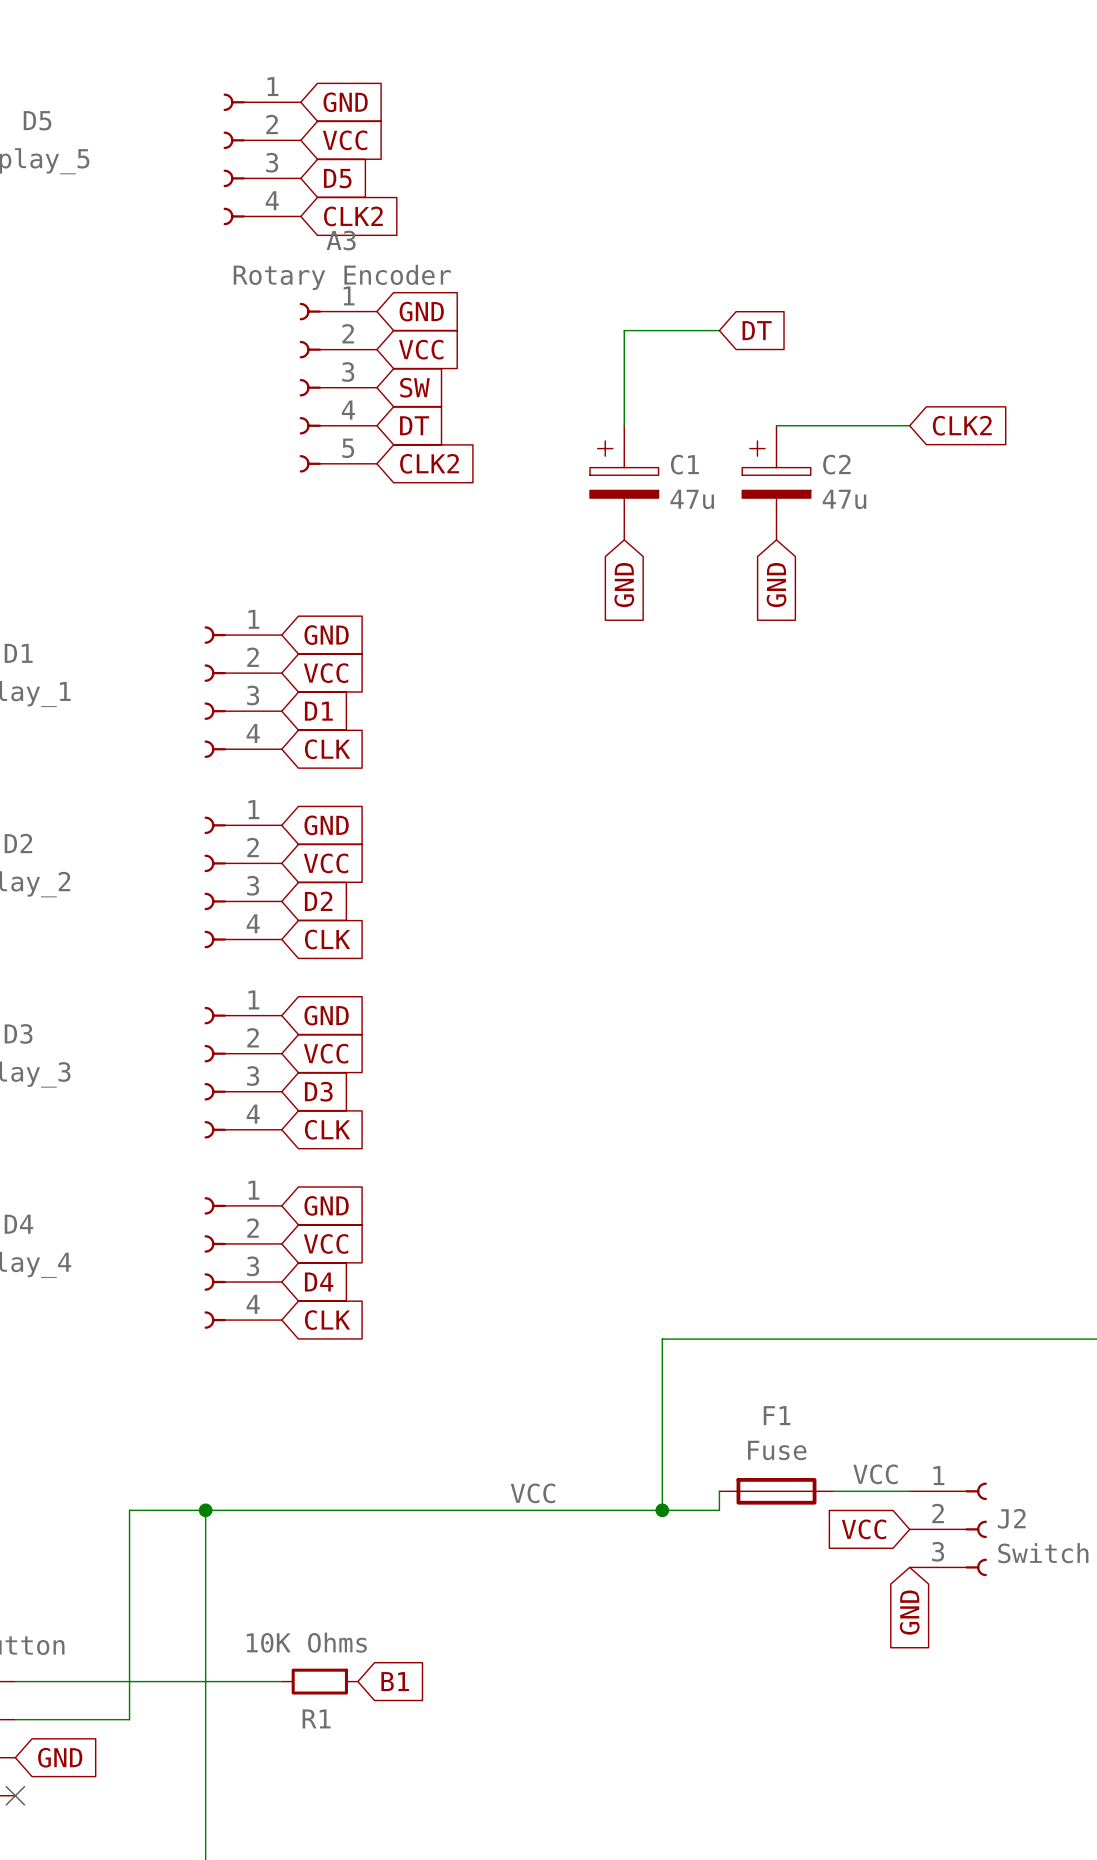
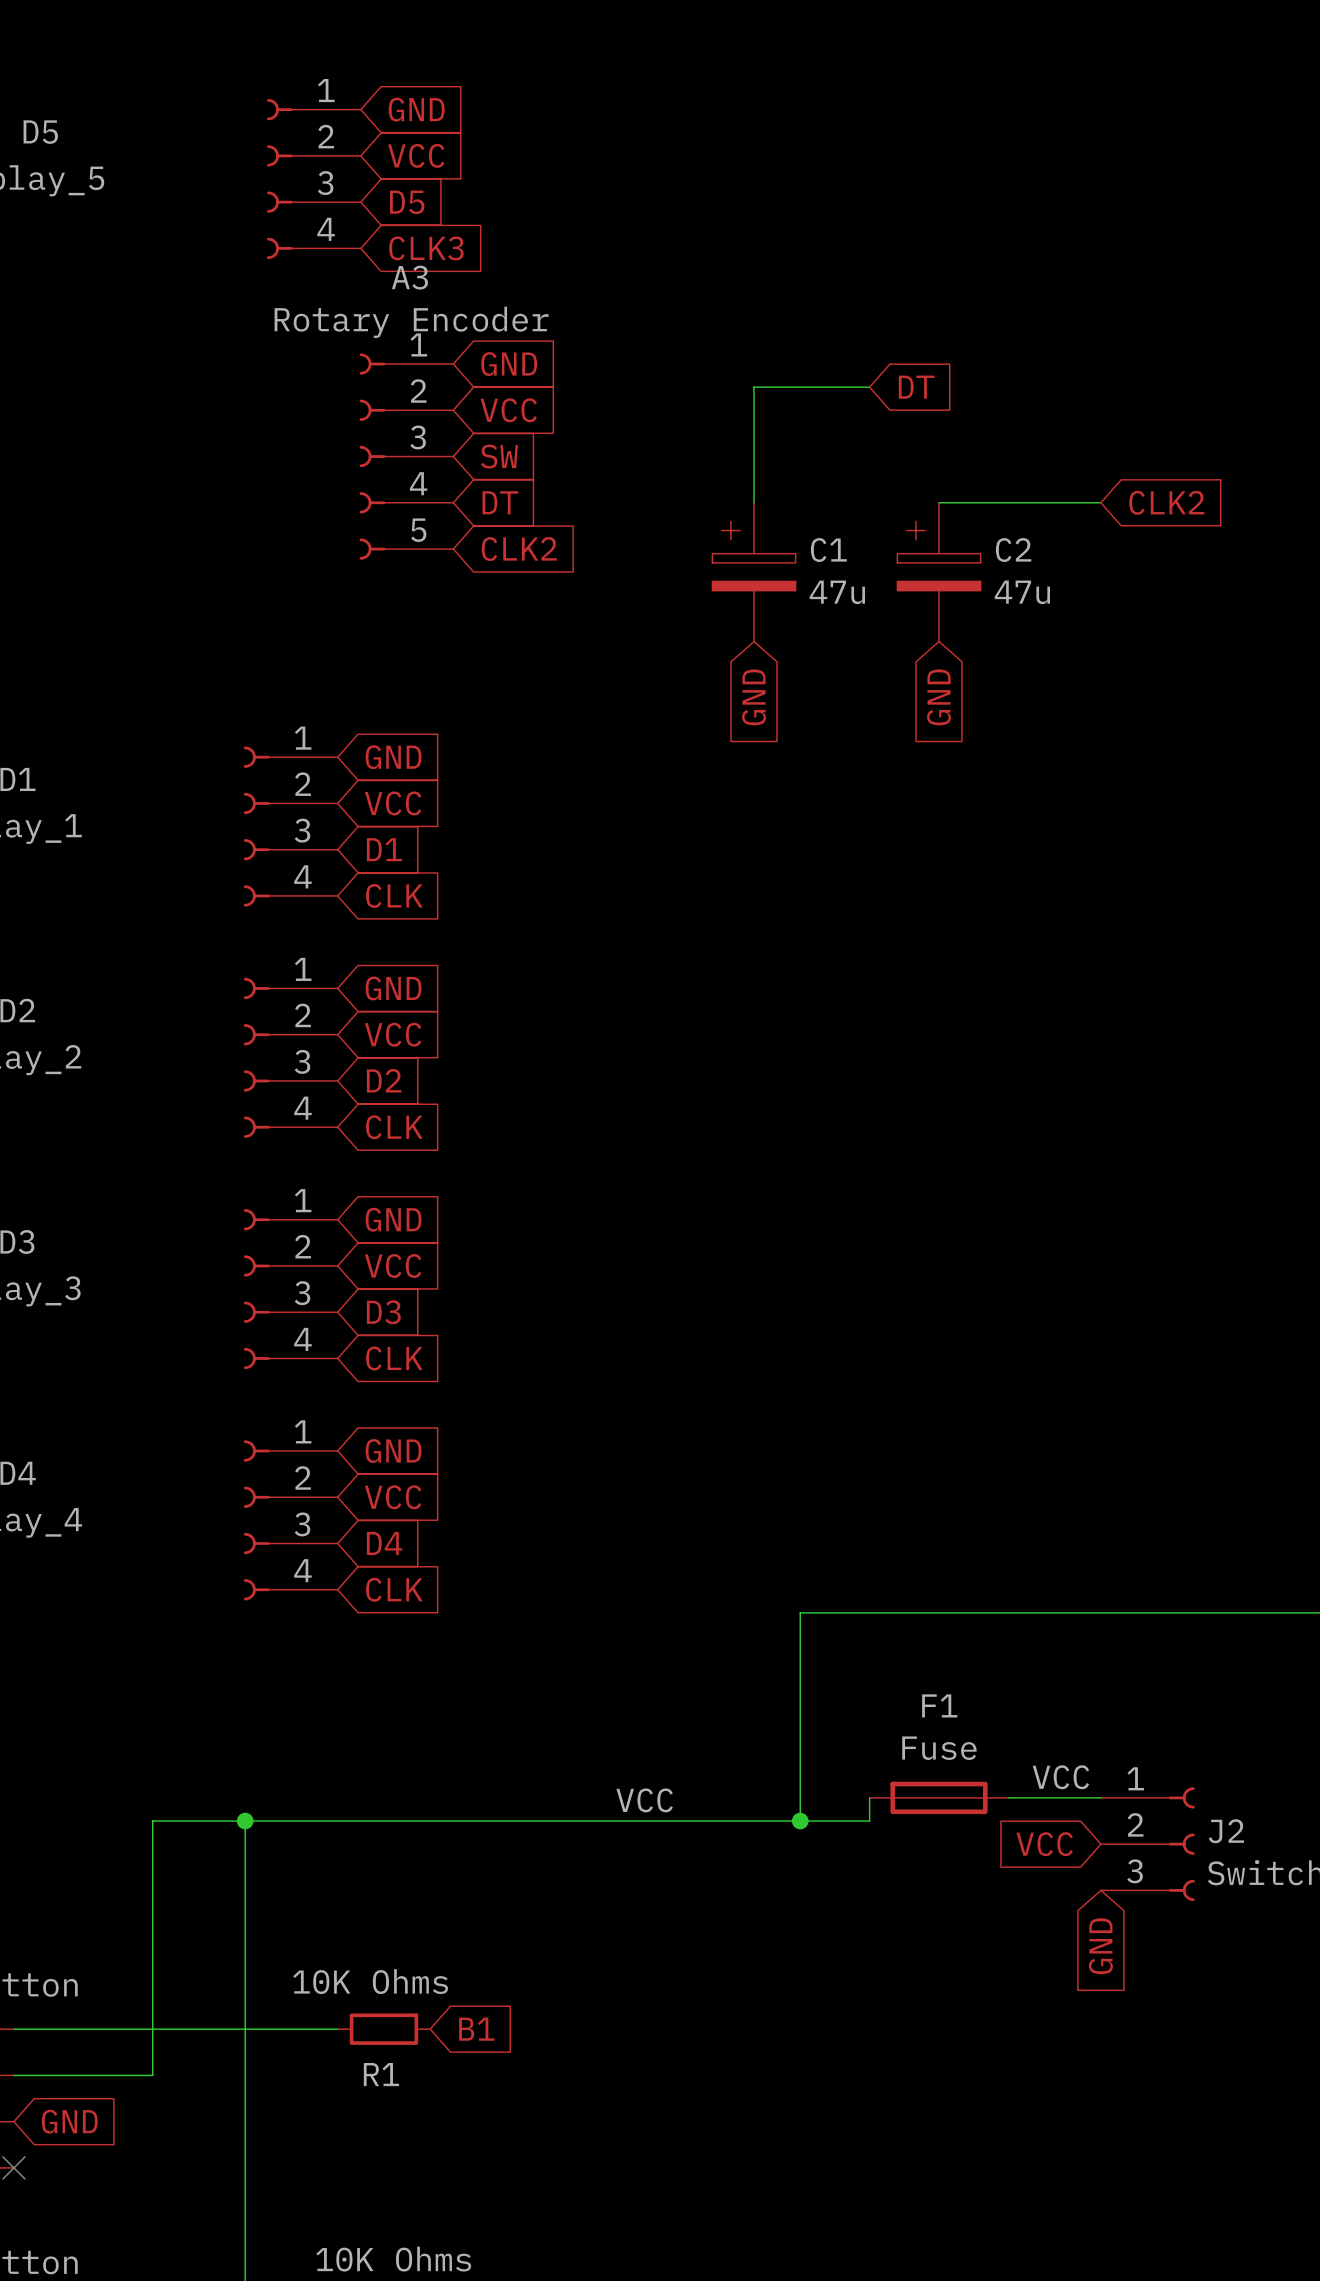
global label: CLK2 (353, 216) -> CLK3 (426, 248)

